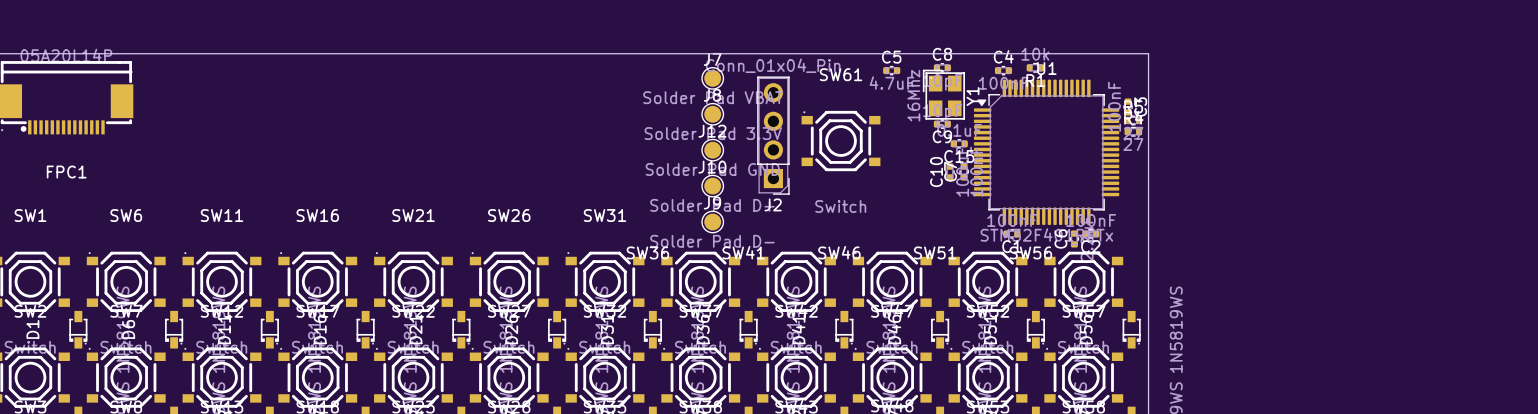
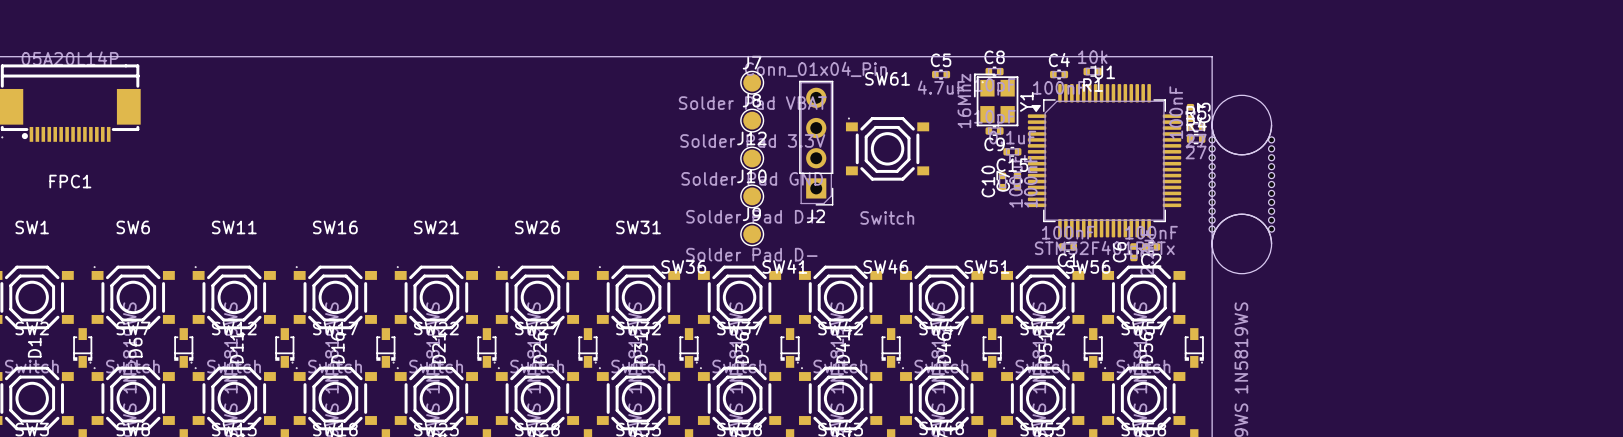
round board edge: none -> [1211, 95, 1272, 156]
part: none -> (1241, 184)
round board edge: none -> [1211, 213, 1272, 274]

